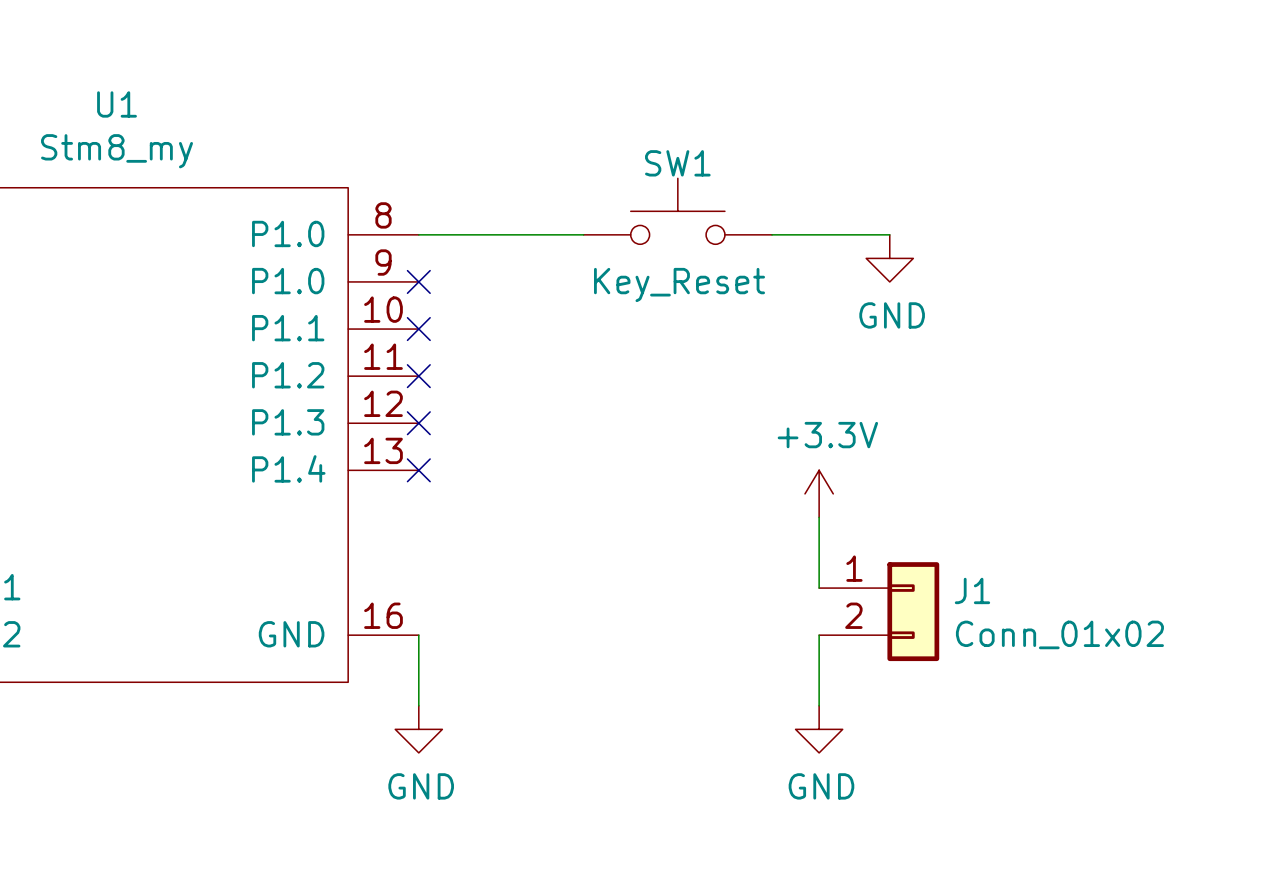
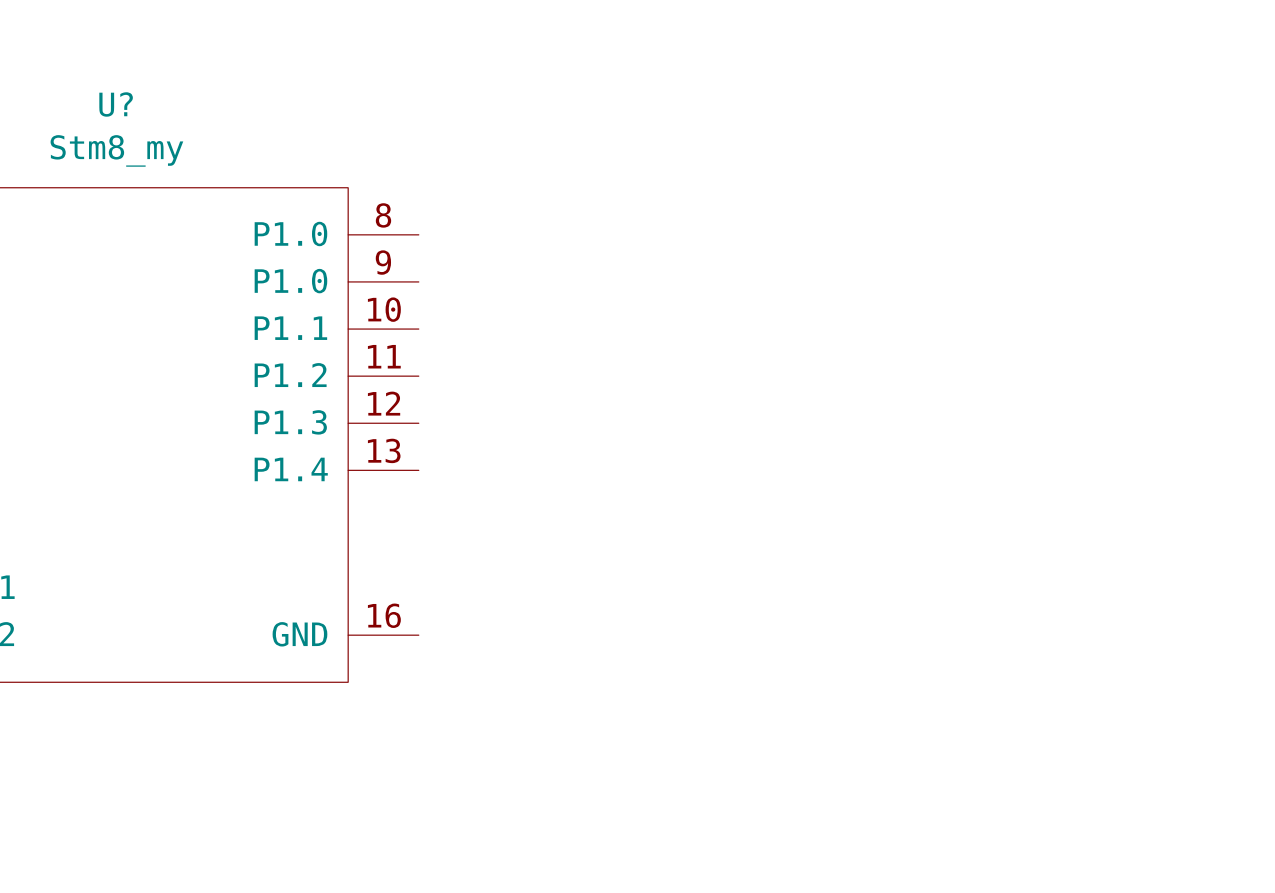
U1 name: U1 (117, 104) -> U? (116, 104)
SW1: Key_Reset (677, 211) -> none
wire: (418, 234) (583, 234) -> none
wire: (772, 234) (889, 234) -> none
power symbol: GND (889, 258) -> none
no-connect mark: (418, 281) -> none
no-connect mark: (418, 329) -> none
no-connect mark: (418, 376) -> none
no-connect mark: (418, 423) -> none
no-connect mark: (418, 470) -> none
power symbol: +3.3V (819, 493) -> none
wire: (819, 517) (819, 588) -> none
J1: Conn_01x02 (879, 611) -> none
wire: (418, 635) (418, 705) -> none
wire: (819, 635) (819, 705) -> none
power symbol: GND (418, 729) -> none
power symbol: GND (819, 729) -> none

